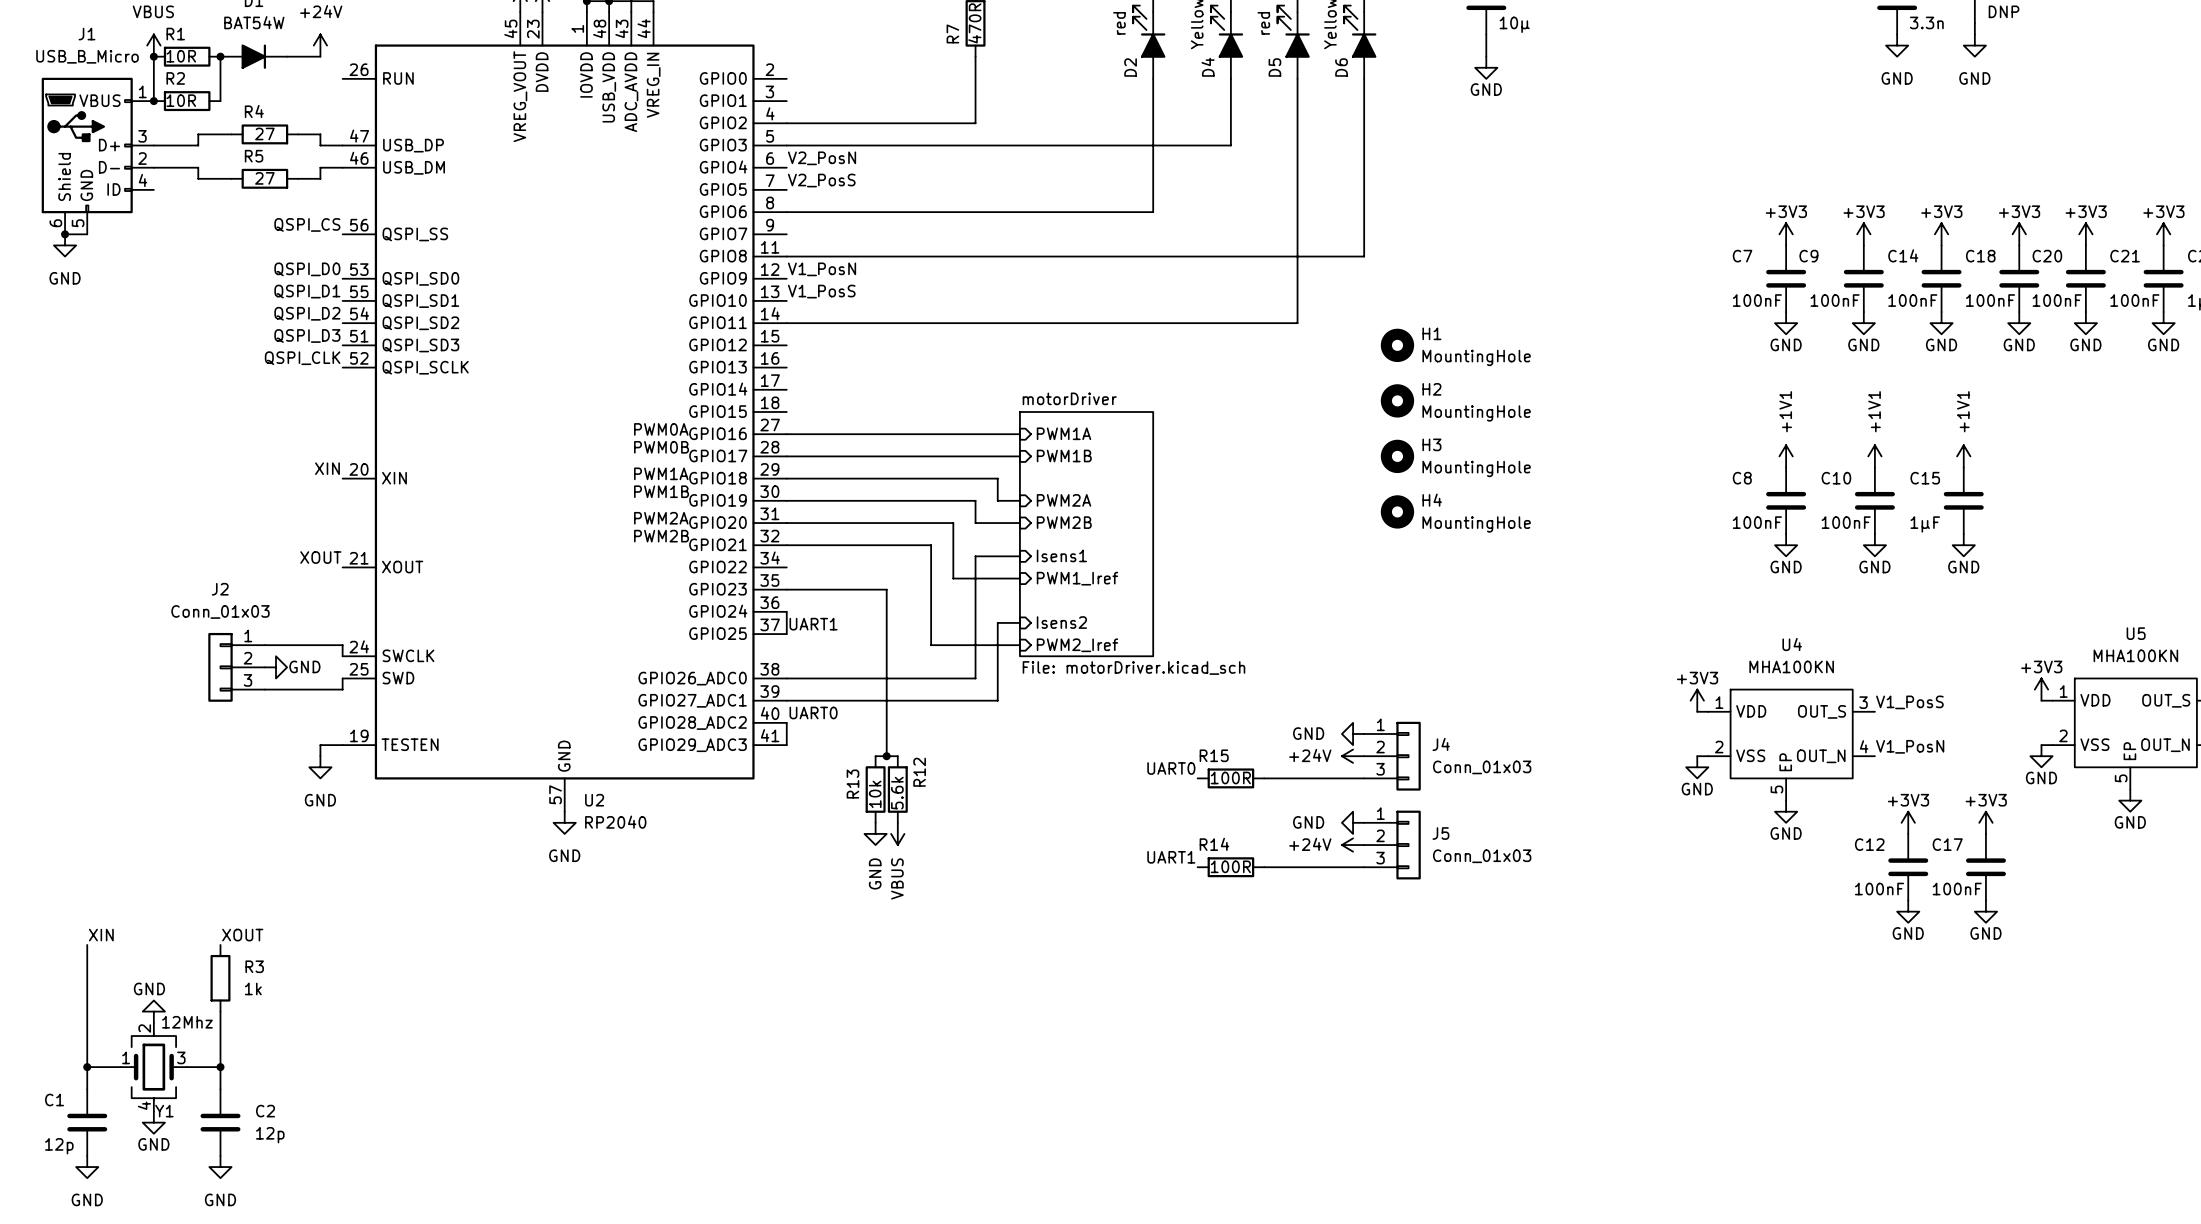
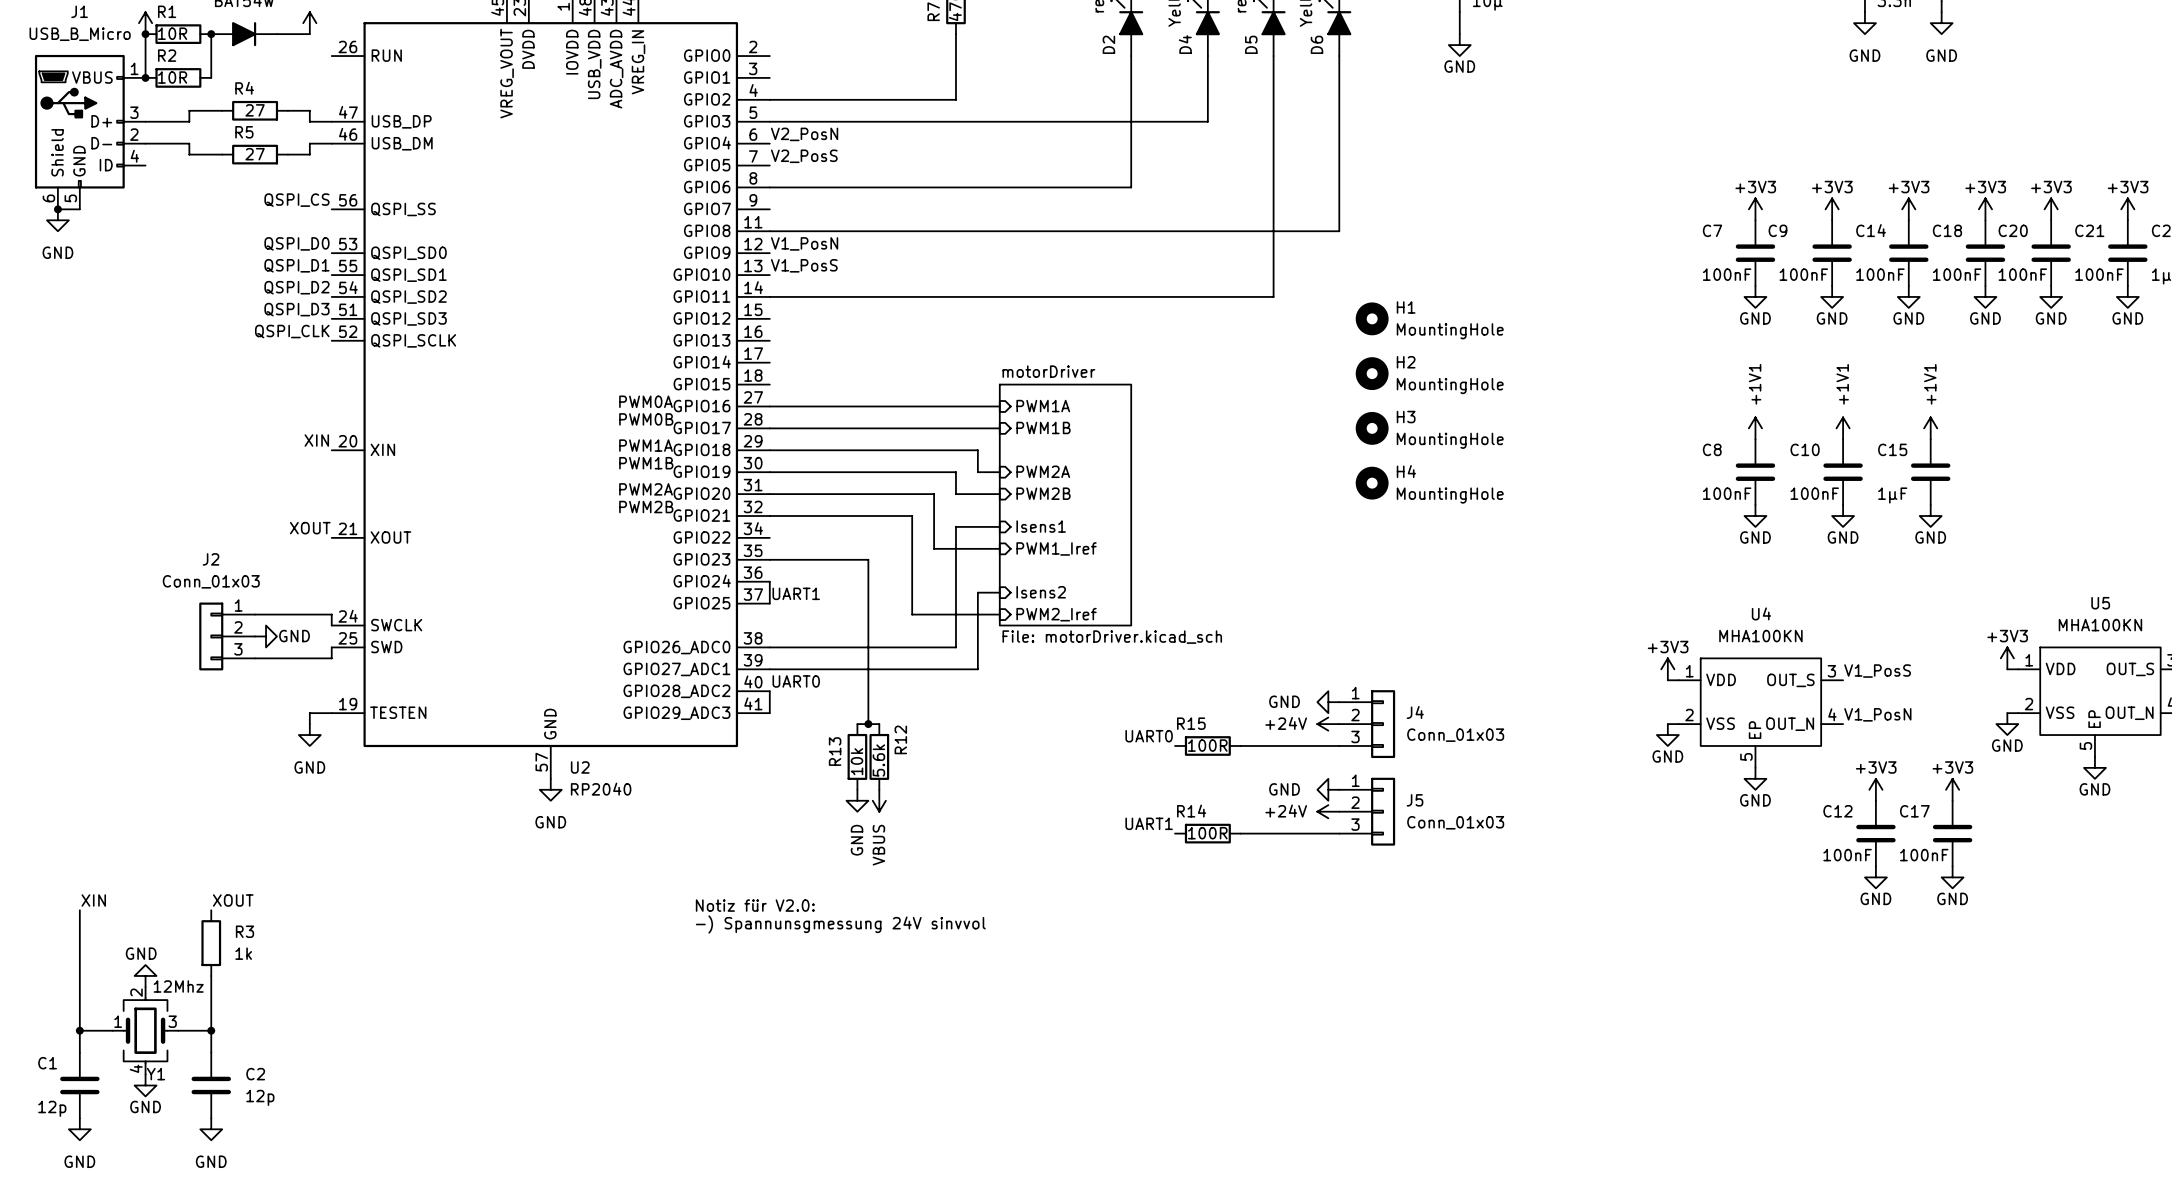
text: none -> Notiz für V2.0: (755, 905)
text: none -> -) Spannunsgmessung 24V sinvvol (840, 924)

